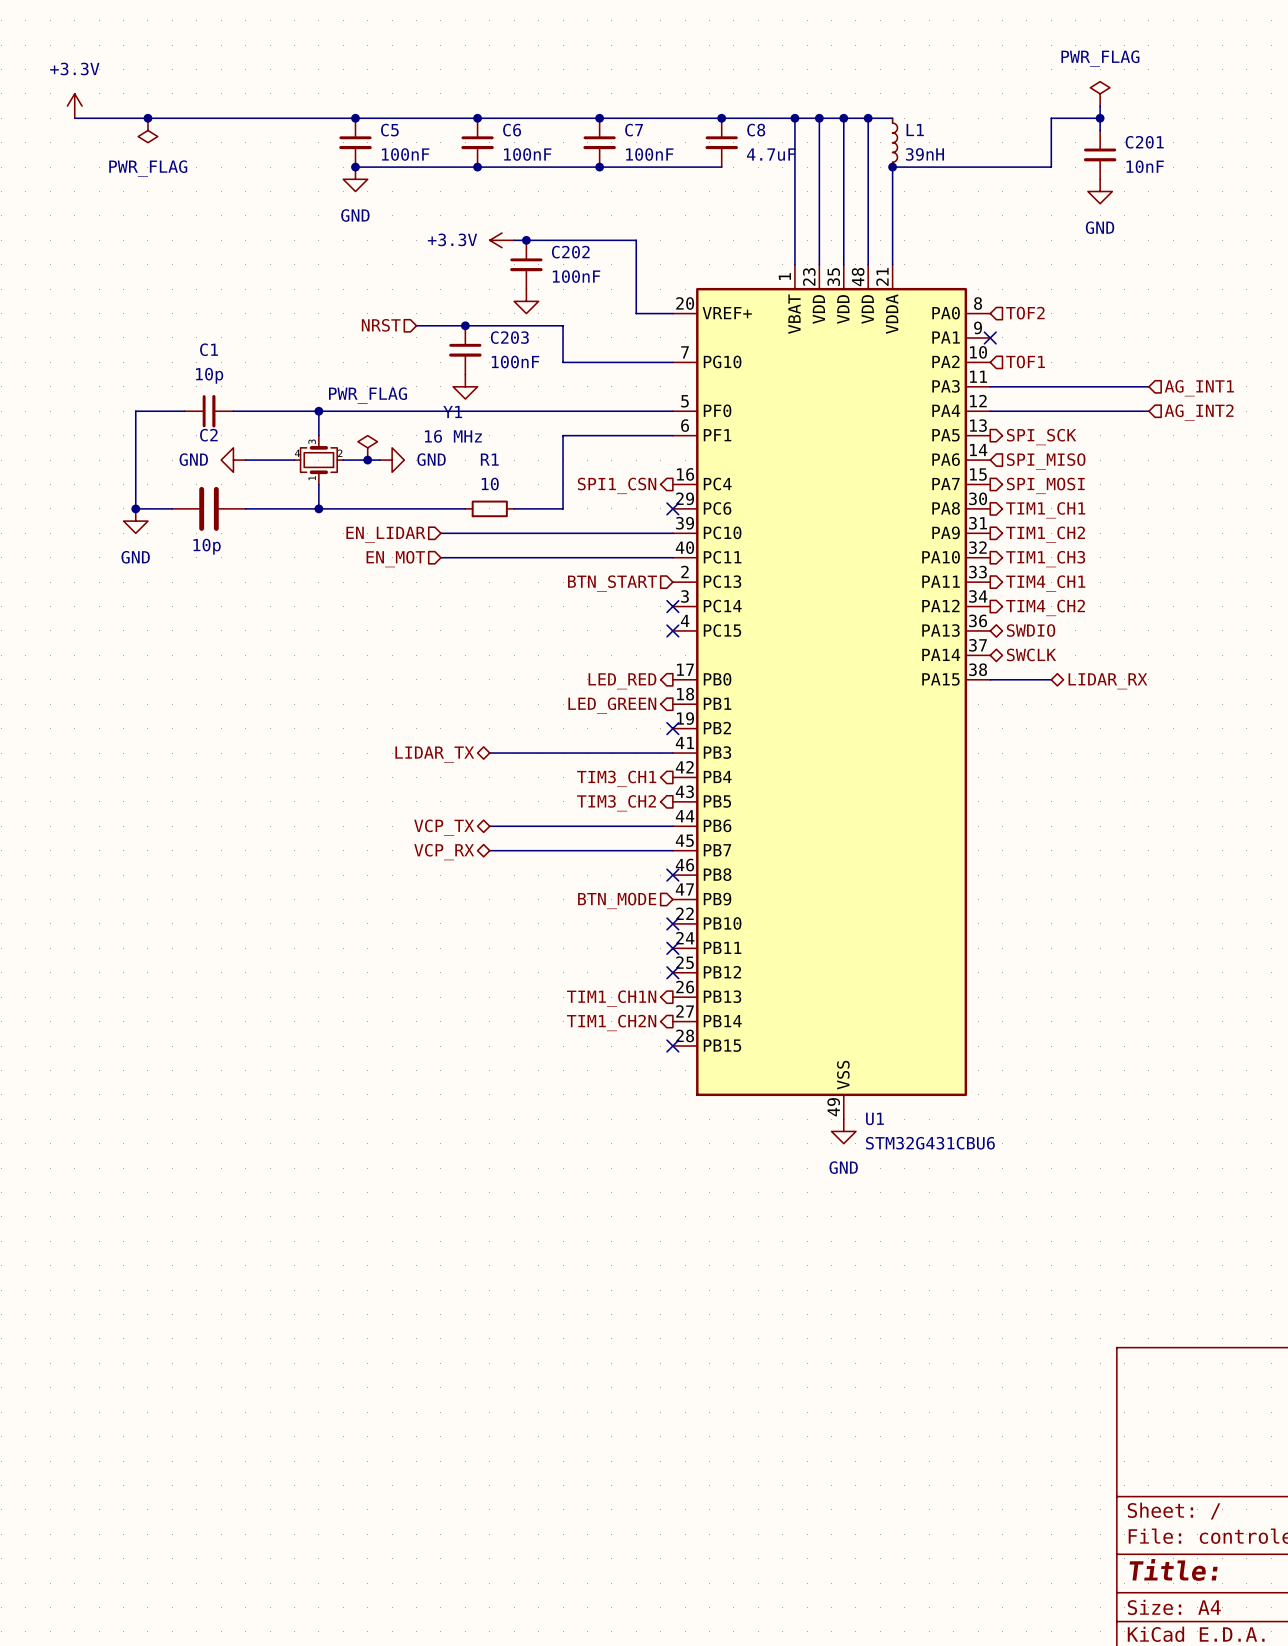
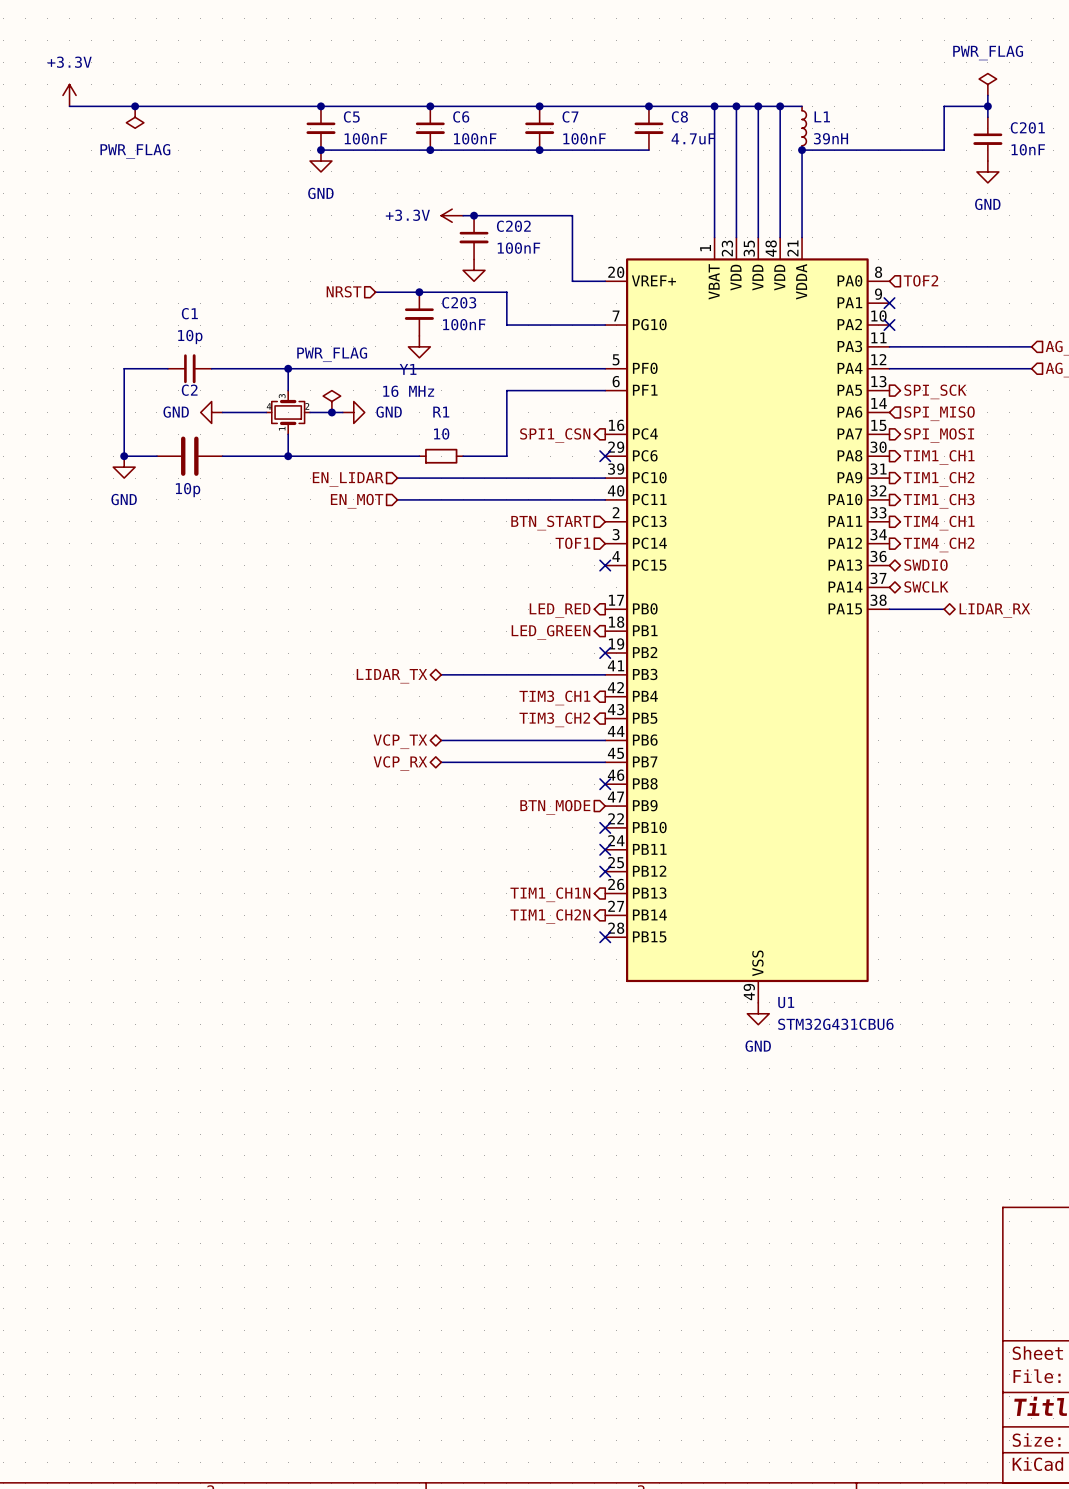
hierarchical label: TOF1 (1025, 361) -> none
no-connect mark: none -> (889, 325)
hierarchical label: none -> TOF1 (572, 543)
no-connect mark: (672, 606) -> none

